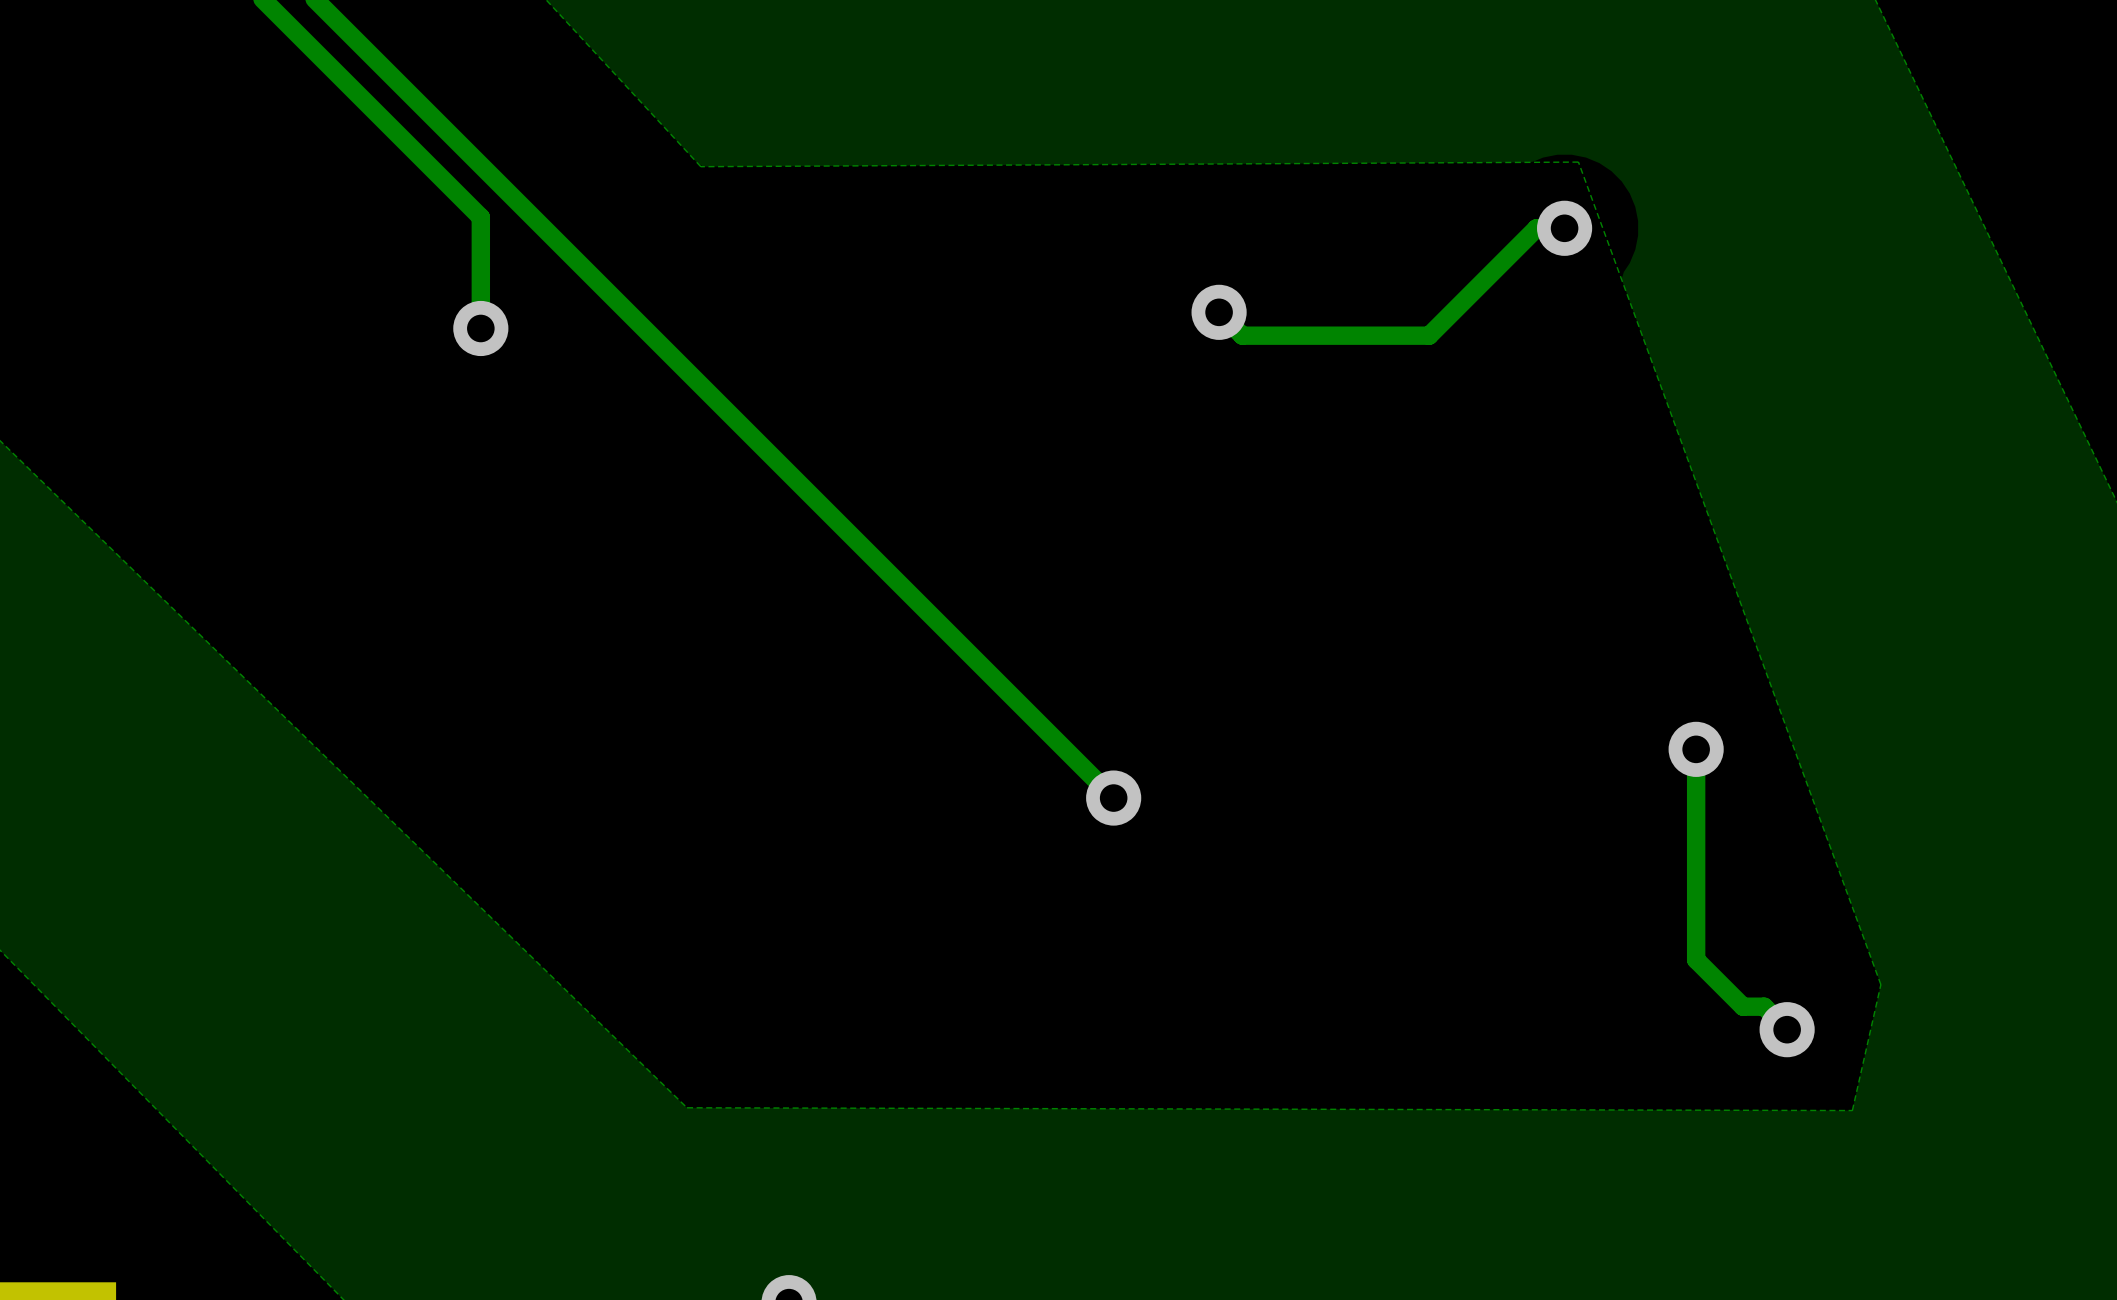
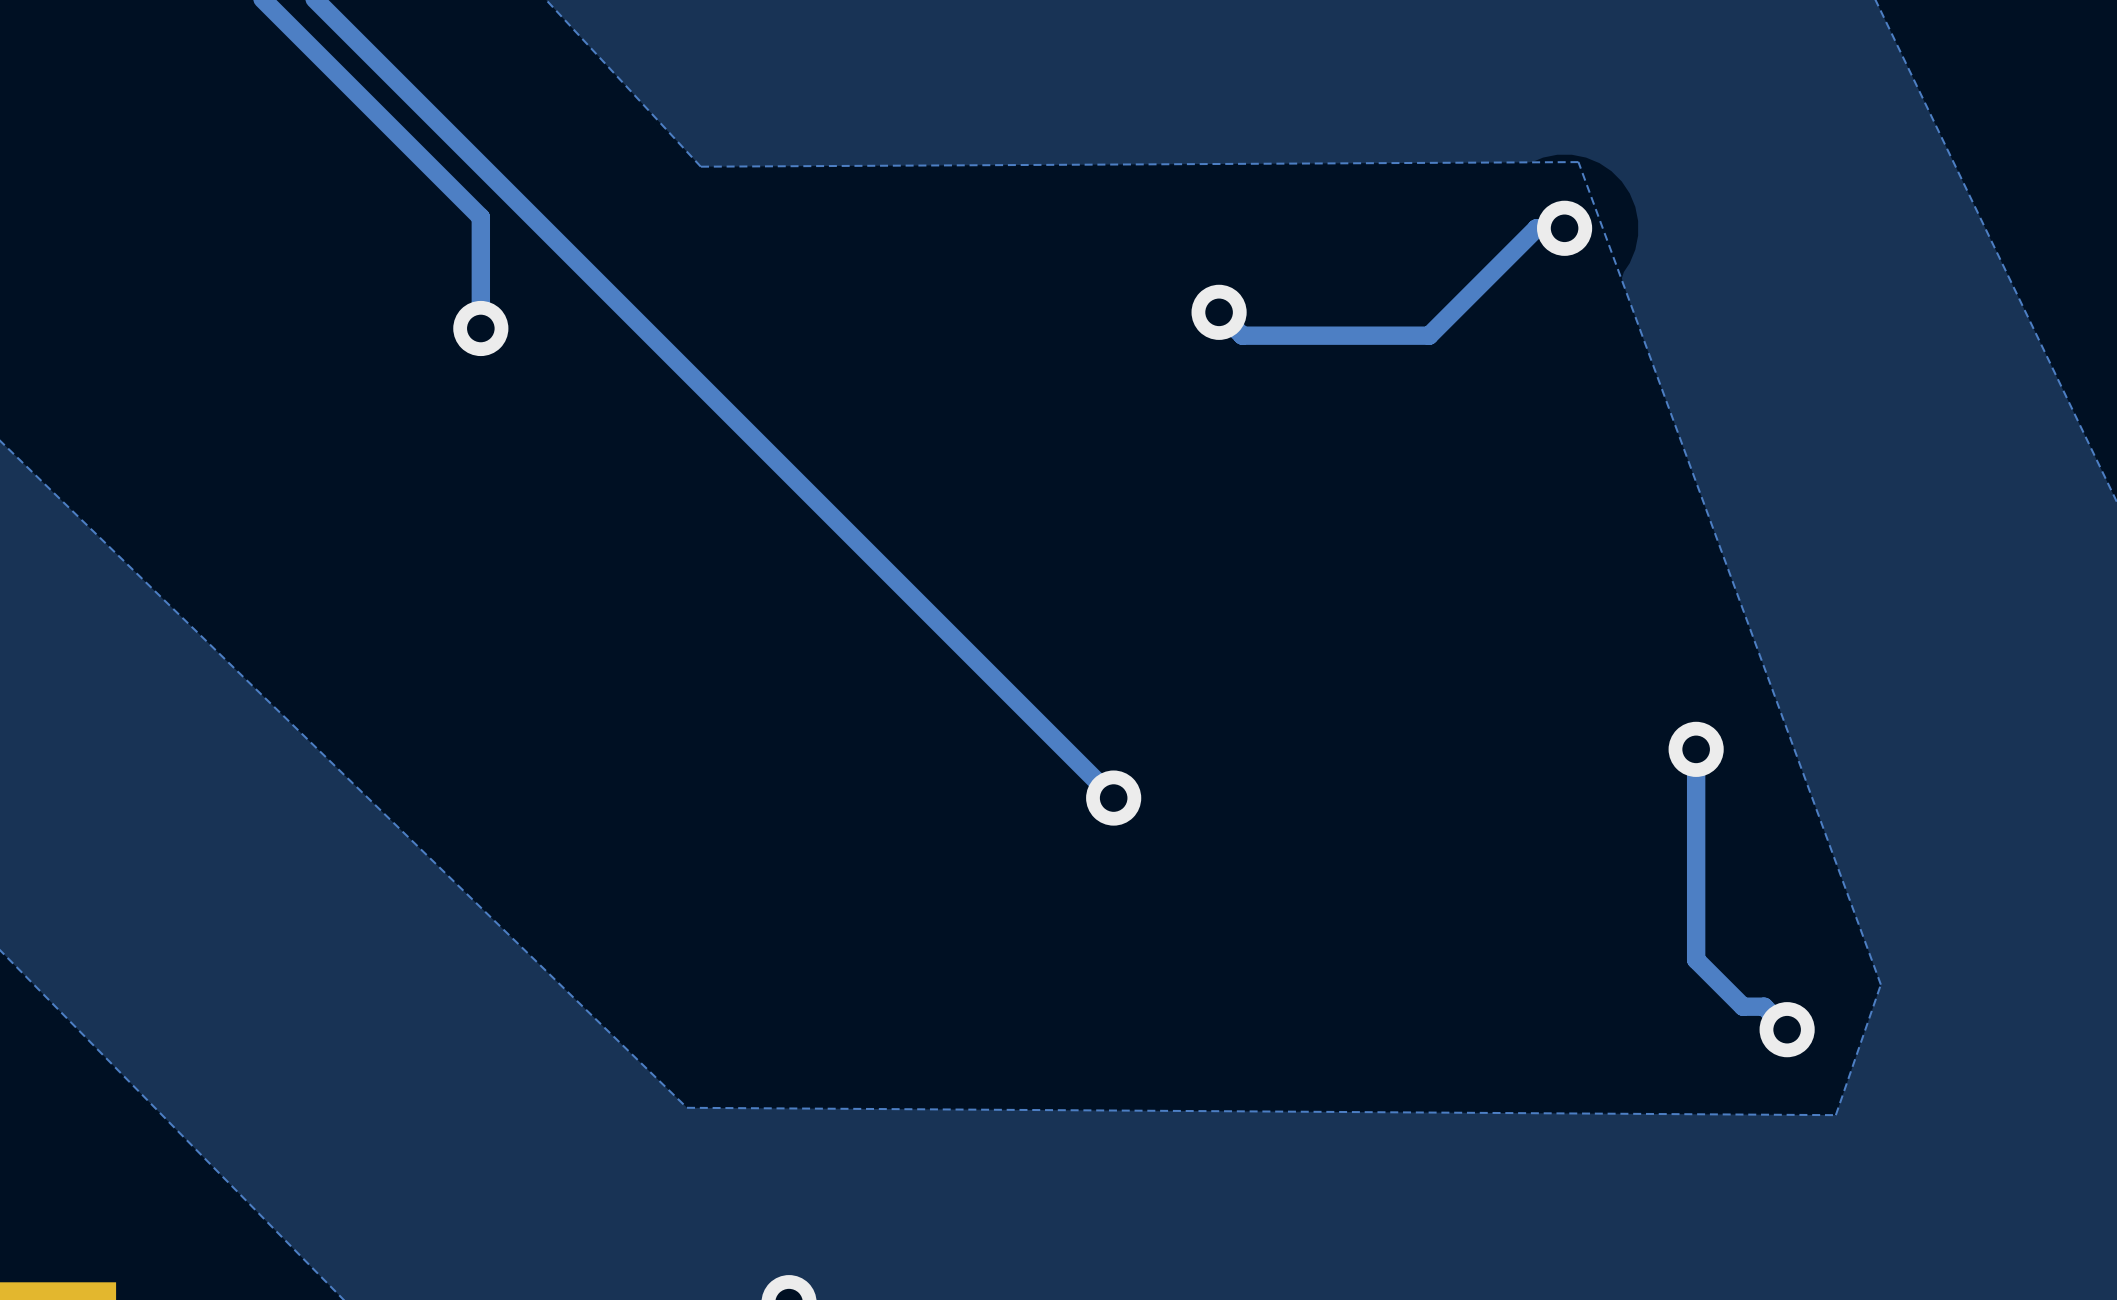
zone outline: (1880, 984) (1852, 1110) (687, 1107) -> (1880, 984) (1835, 1115) (687, 1107)

